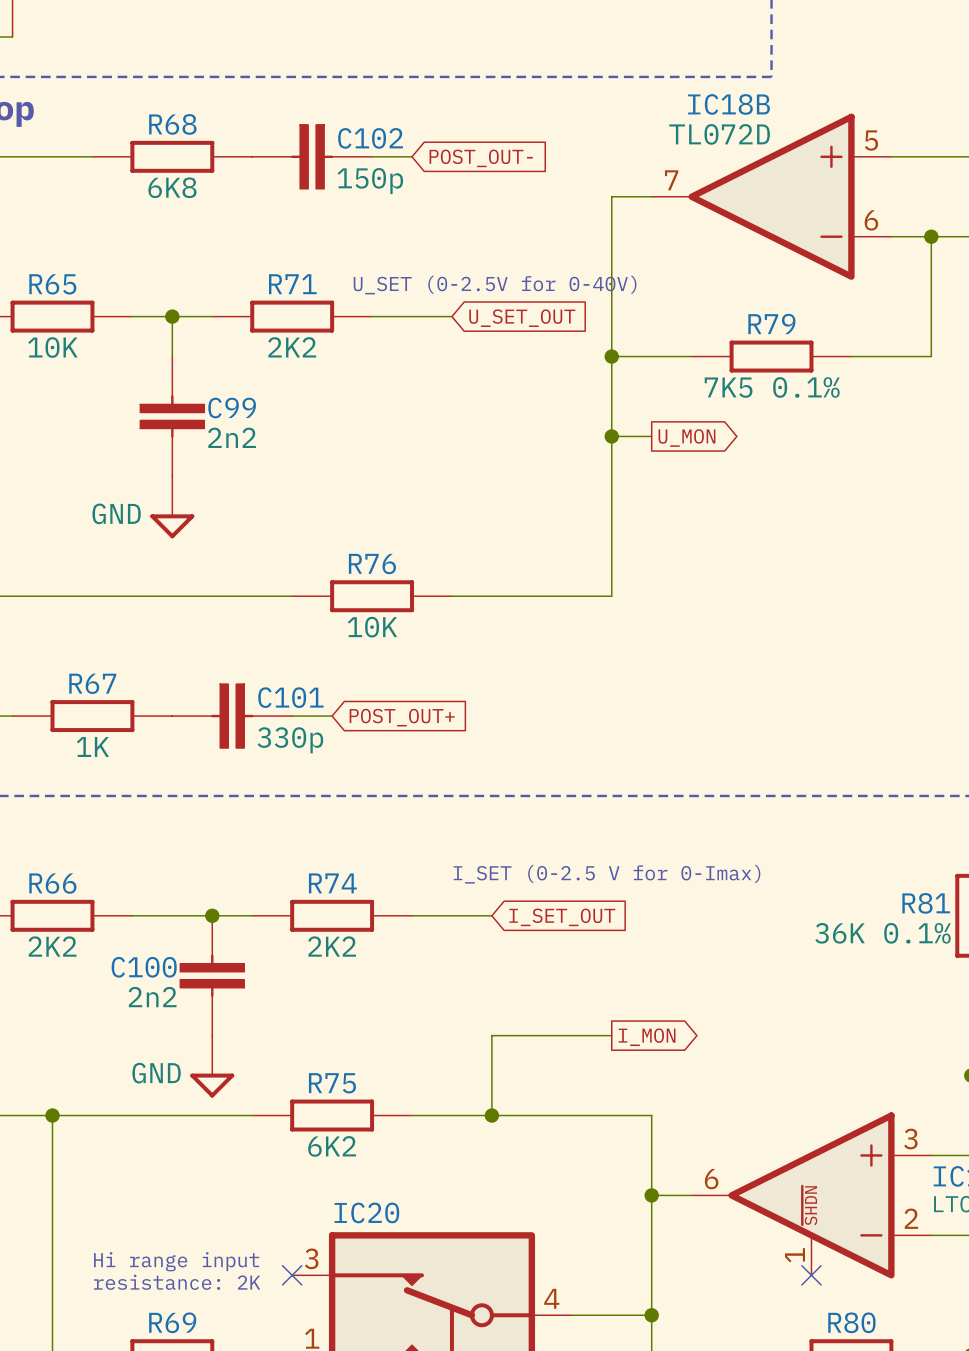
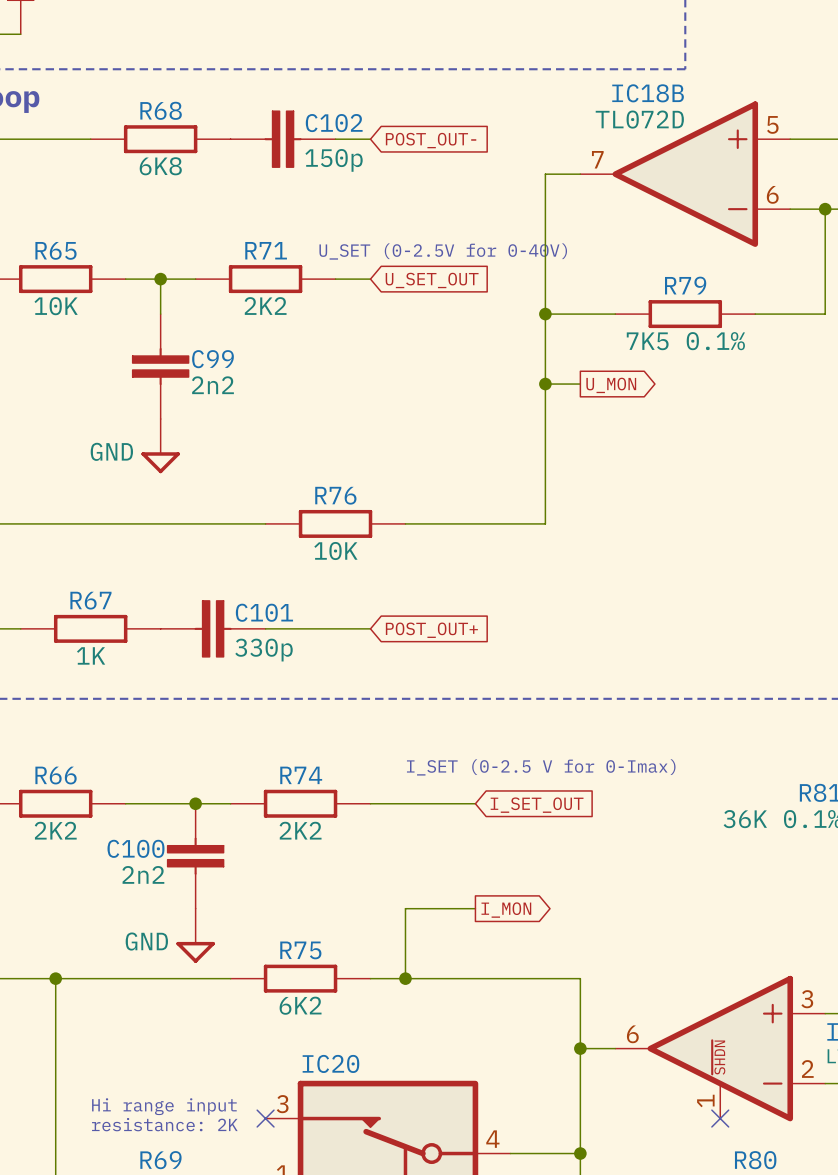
wire: (412, 316) (451, 316) -> none
global label position: U_SET_OUT (522, 318) -> U_SET_OUT (432, 280)
global label position: POST_OUT+ (402, 717) -> POST_OUT+ (431, 630)
wire: none -> (440, 803) (475, 803)
global label position: I_SET_OUT (562, 917) -> I_SET_OUT (537, 805)
wire: (491, 1035) (491, 1115) -> (440, 908) (405, 908) (405, 978)
wire: (531, 1035) (611, 1035) -> (300, 628) (370, 628)
global label position: I_MON (647, 1037) -> I_MON (506, 910)
junction position: (491, 1115) -> (405, 978)

